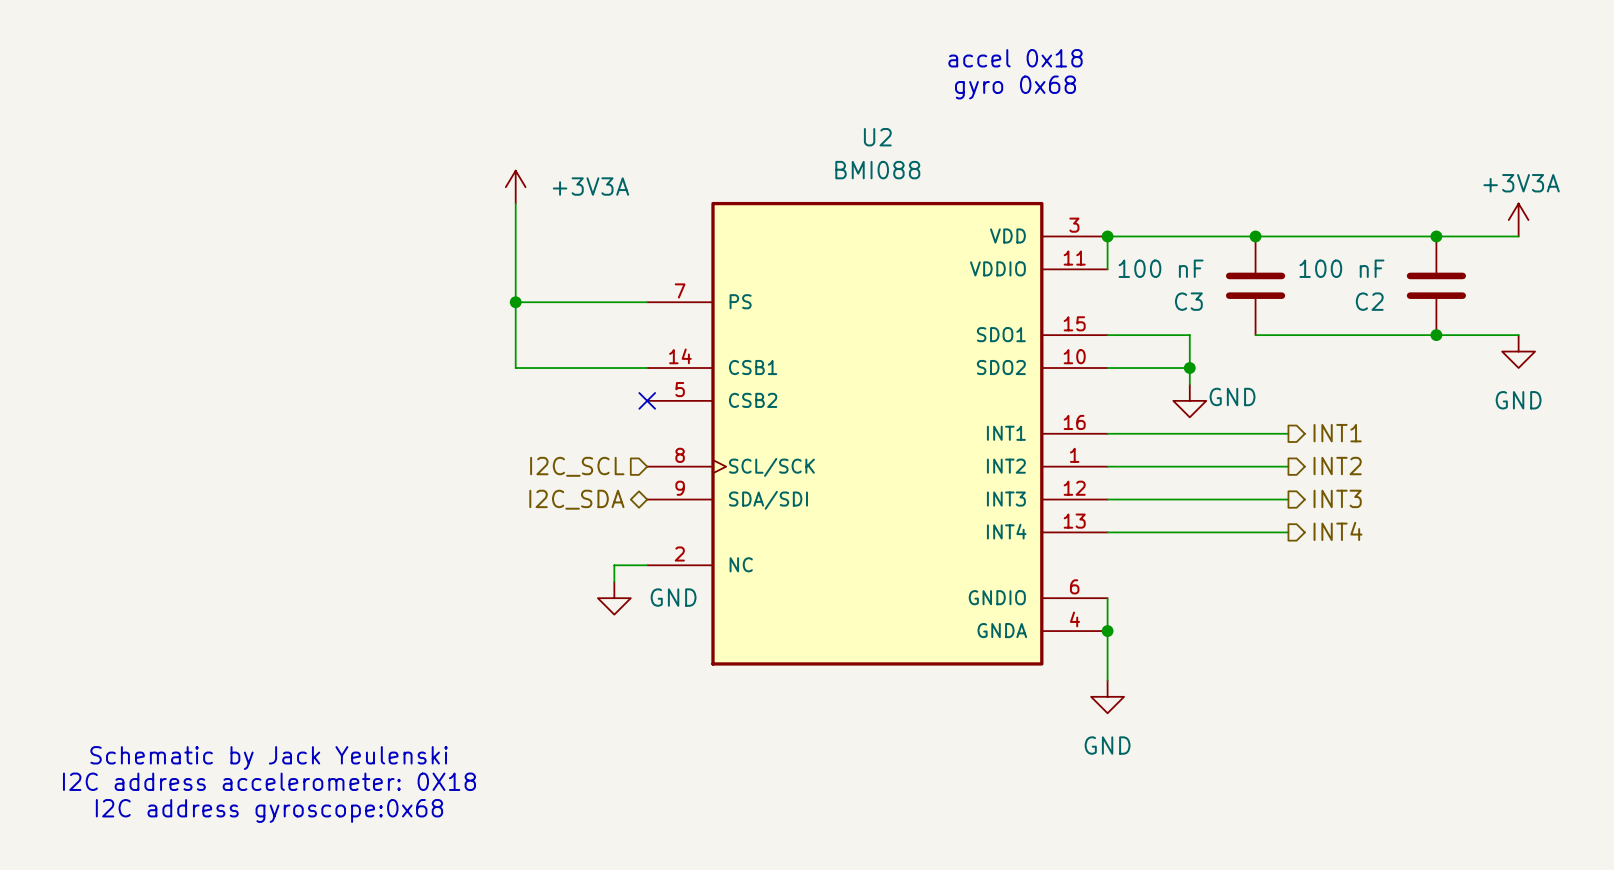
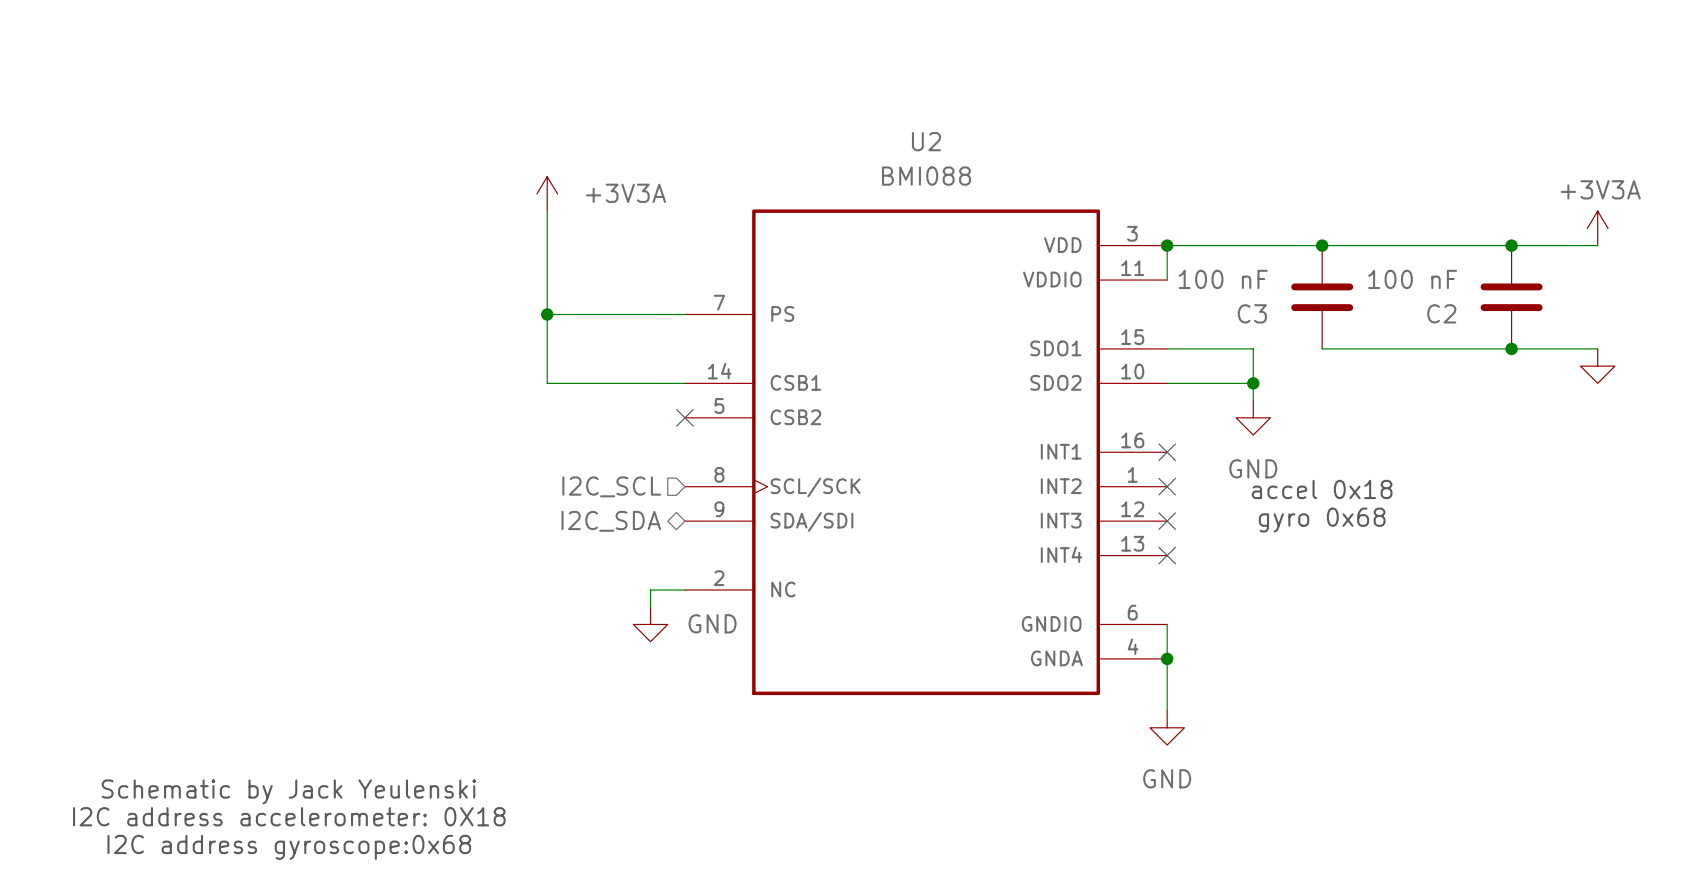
text: accel 0x18 (1015, 58) -> none
text: gyro 0x68 (1015, 87) -> none
power symbol text position: GND (1232, 396) -> GND (1253, 468)
power symbol text: GND (1518, 400) -> none
wire: (1107, 433) (1288, 433) -> none
no-connect mark: none -> (1167, 452)
hierarchical label: INT1 (1337, 433) -> none
wire: (1107, 466) (1288, 466) -> none
no-connect mark: none -> (1167, 486)
hierarchical label: INT2 (1337, 466) -> none
text: none -> accel 0x18 (1322, 489)
text: none -> gyro 0x68 (1322, 520)
hierarchical label: INT3 (1337, 498) -> none
wire: (1107, 499) (1288, 499) -> none
no-connect mark: none -> (1167, 521)
hierarchical label: INT4 (1338, 531) -> none
wire: (1107, 532) (1288, 532) -> none
no-connect mark: none -> (1167, 555)

